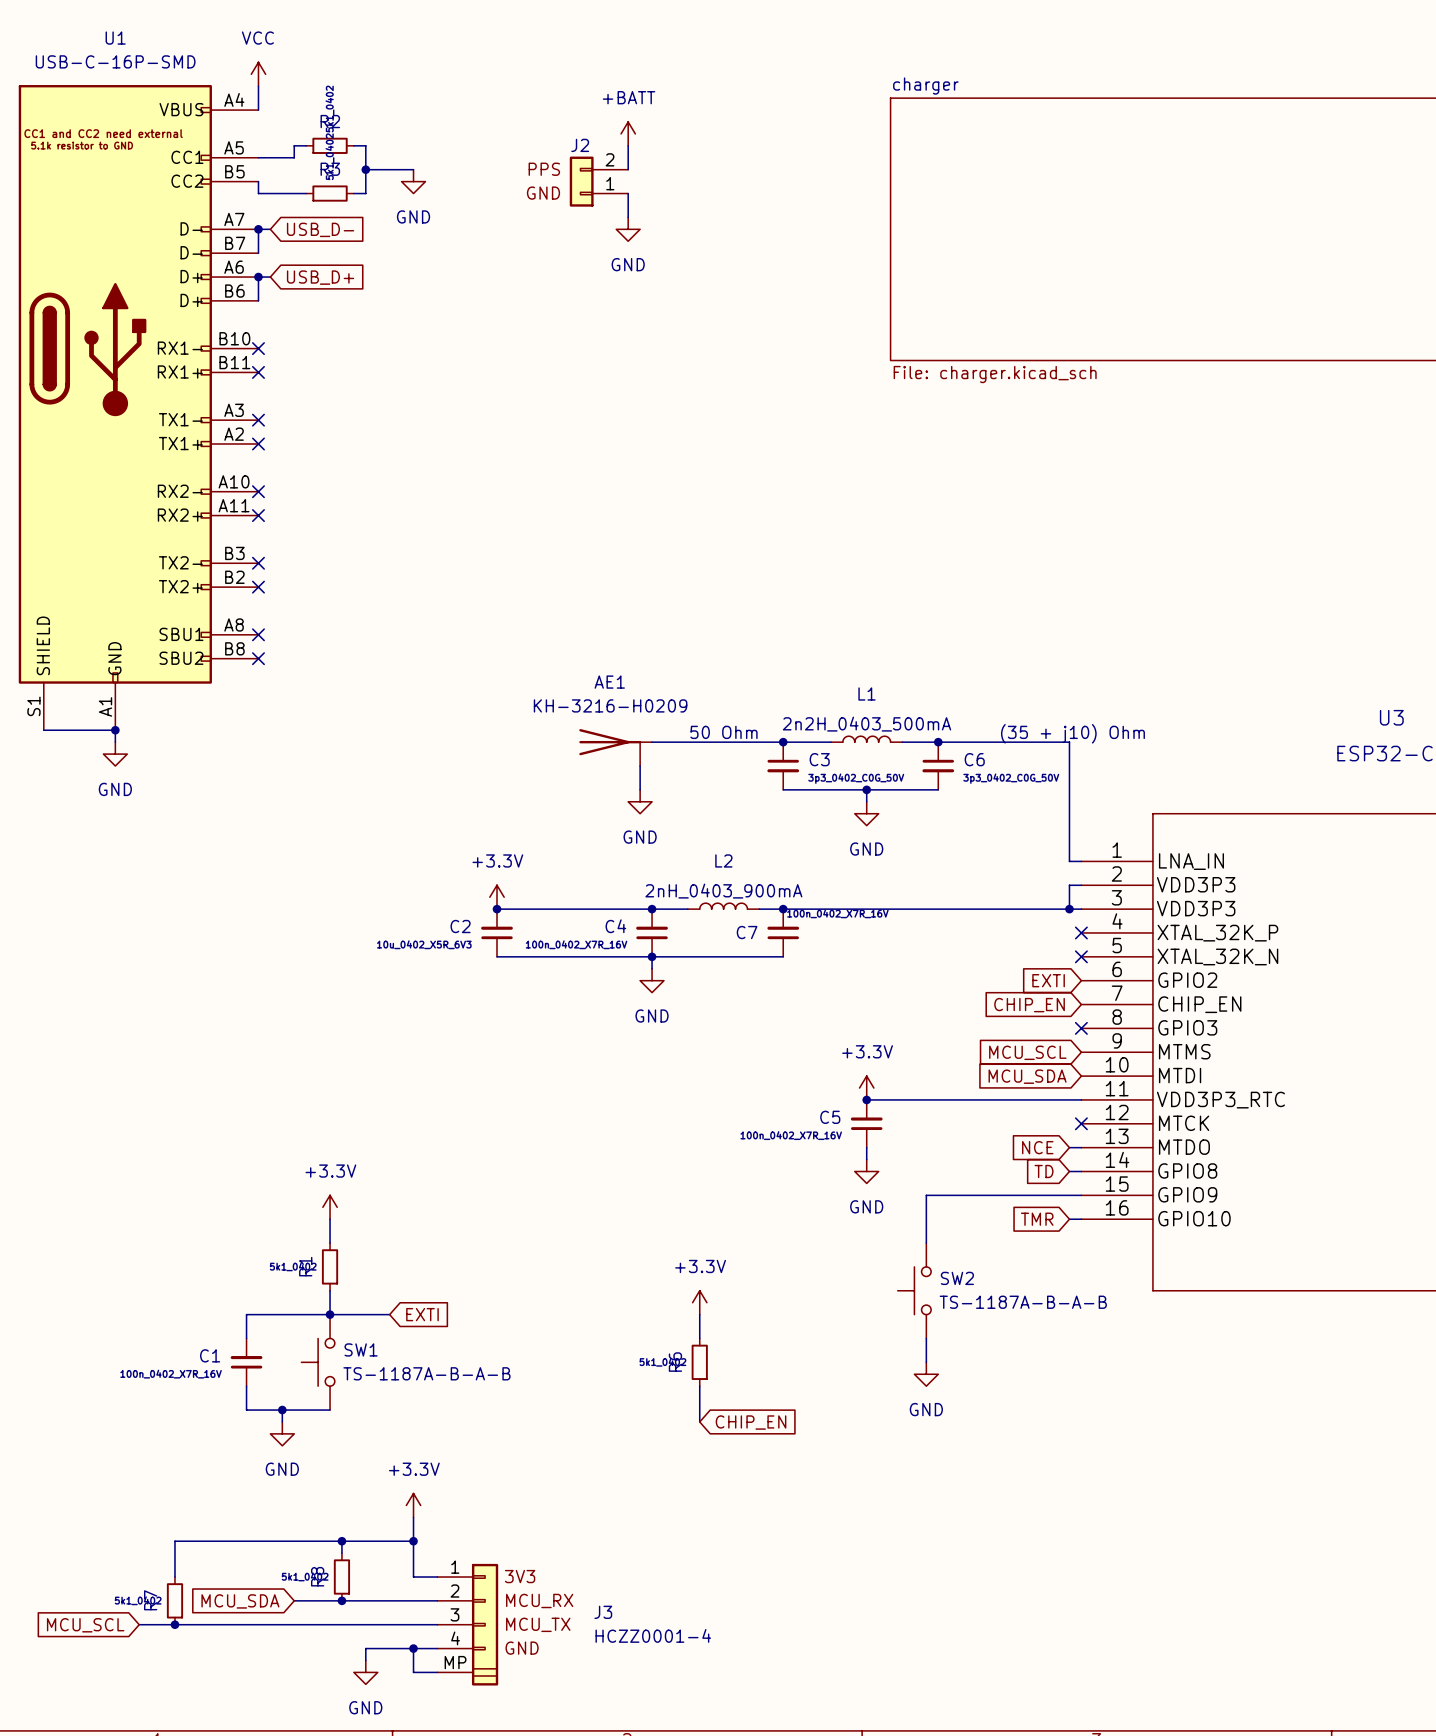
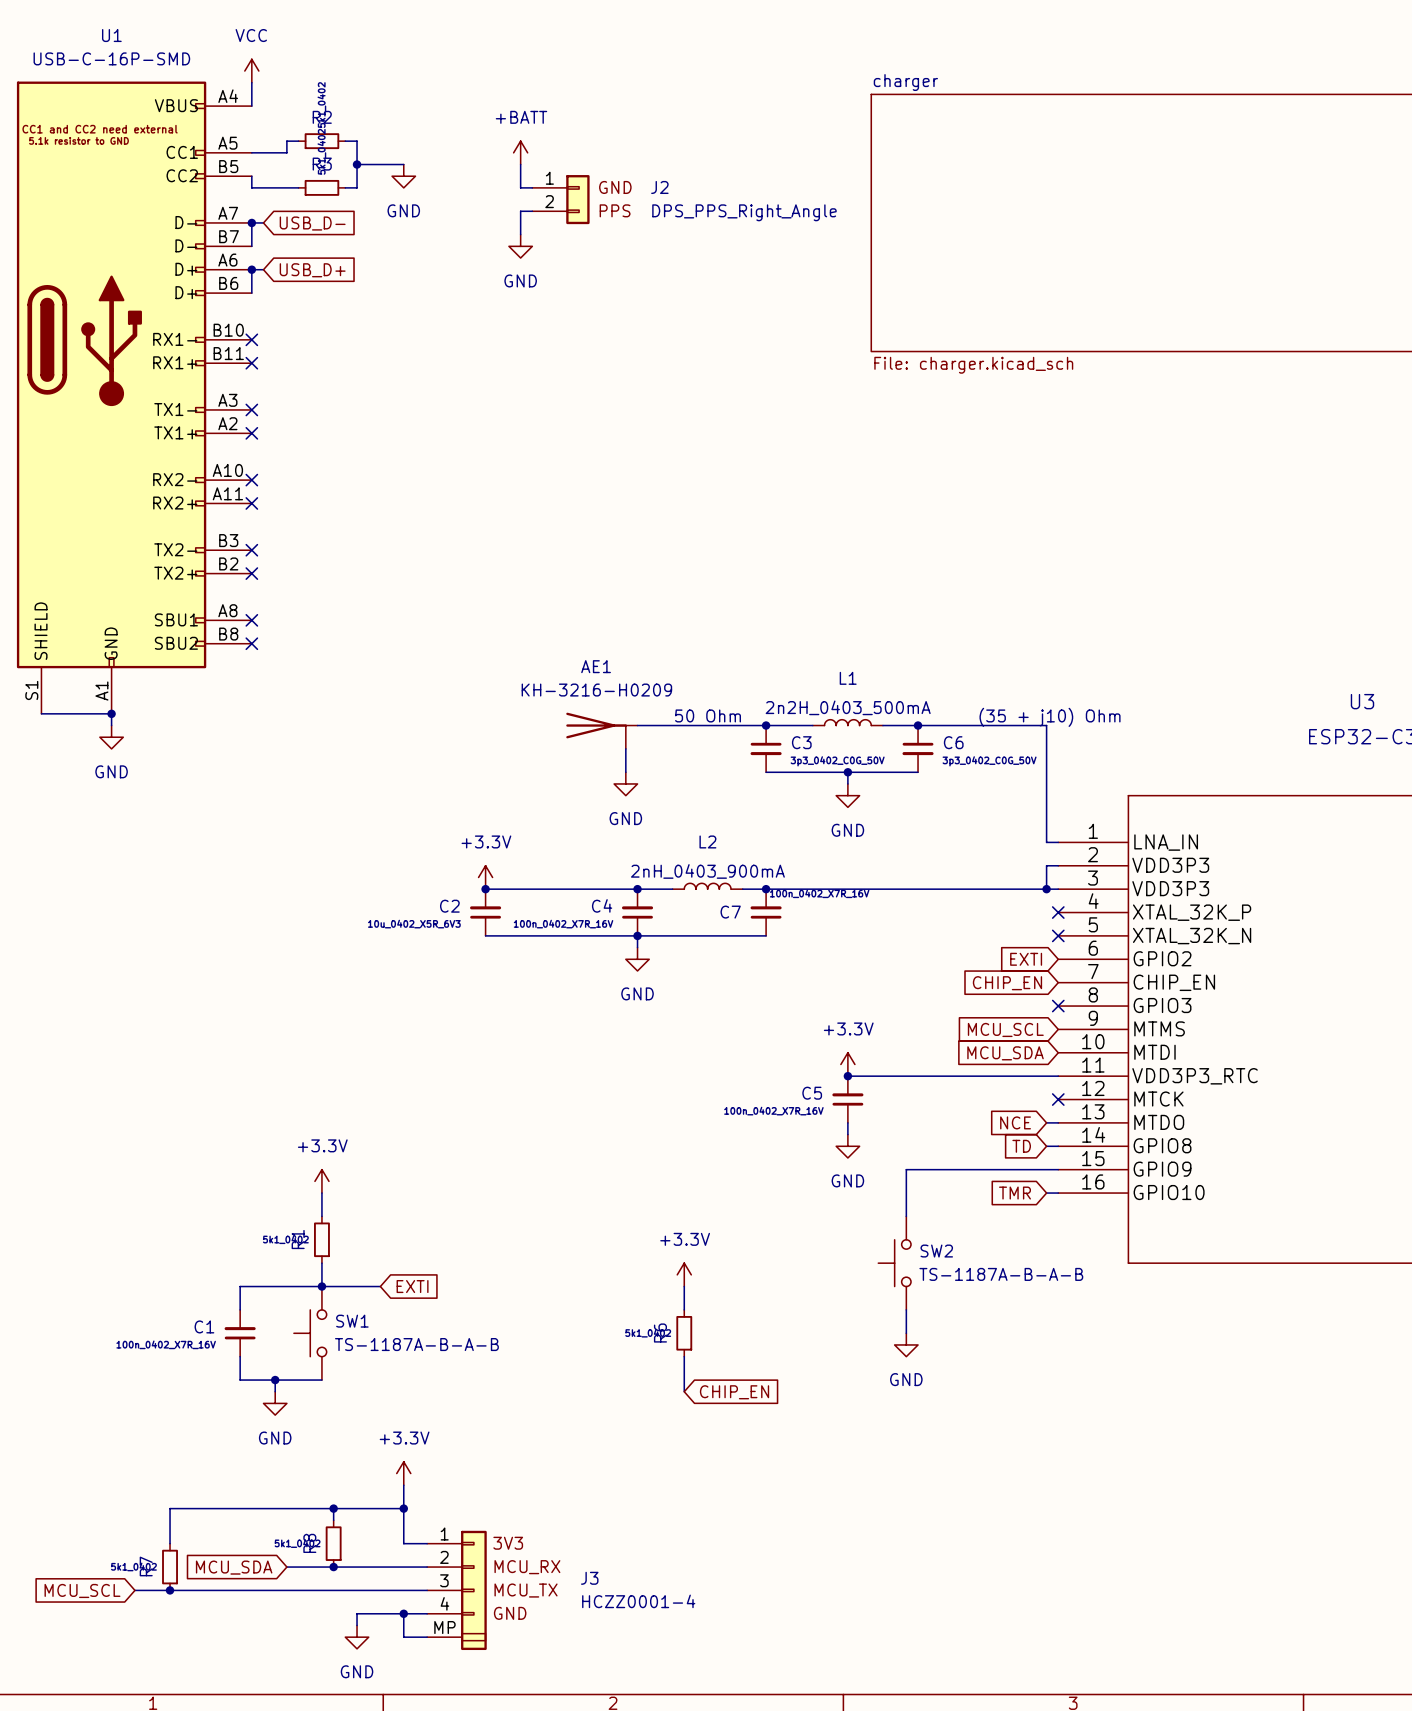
power symbol position: +BATT (628, 133) -> +BATT (520, 152)
J2 name position: J2 (580, 145) -> J2 (659, 187)
wire: (628, 145) (628, 169) -> none
wire: none -> (520, 164) (520, 187) (532, 187)
J2 rotation: 0° (581, 181) -> 180° (577, 199)
wire: (628, 193) (628, 217) -> none
wire: none -> (532, 211) (520, 211) (520, 234)
J2 value: none -> DPS_PPS_Right_Angle (744, 212)
power symbol position: GND (628, 229) -> GND (520, 246)

